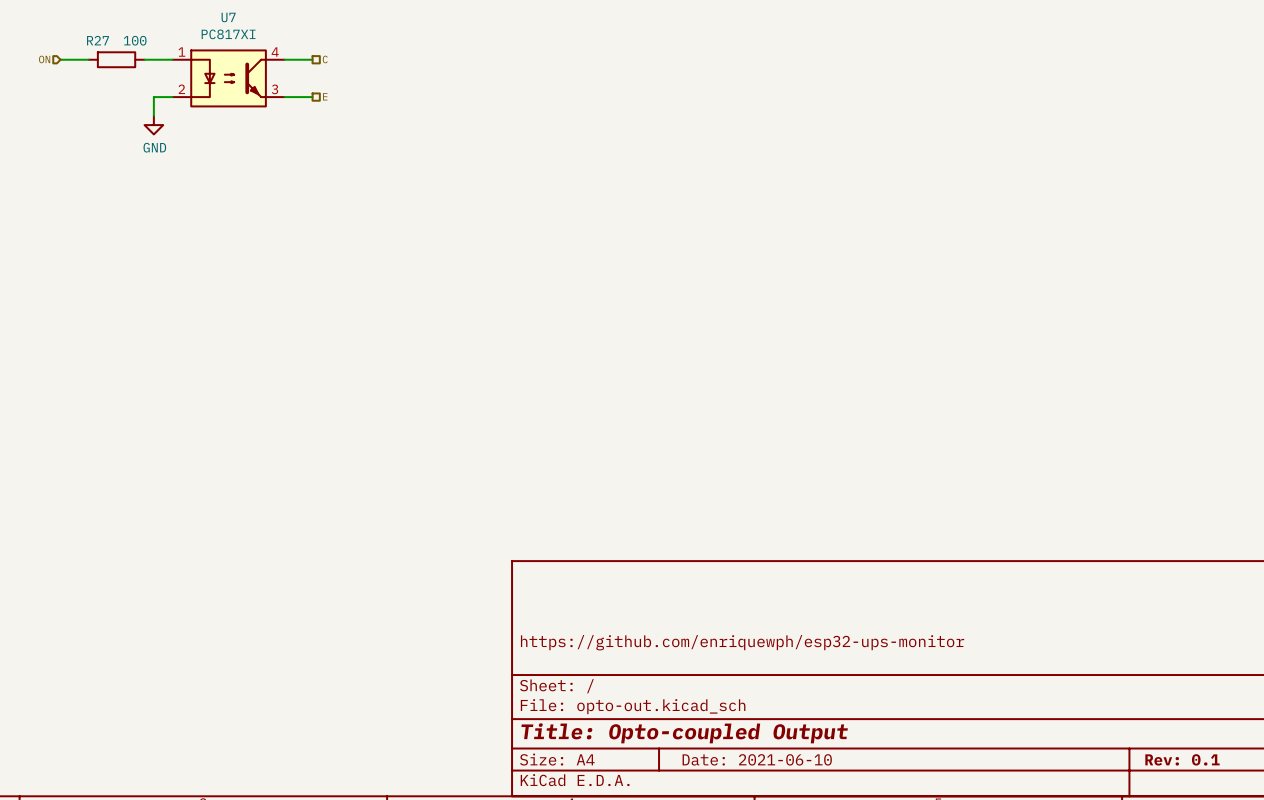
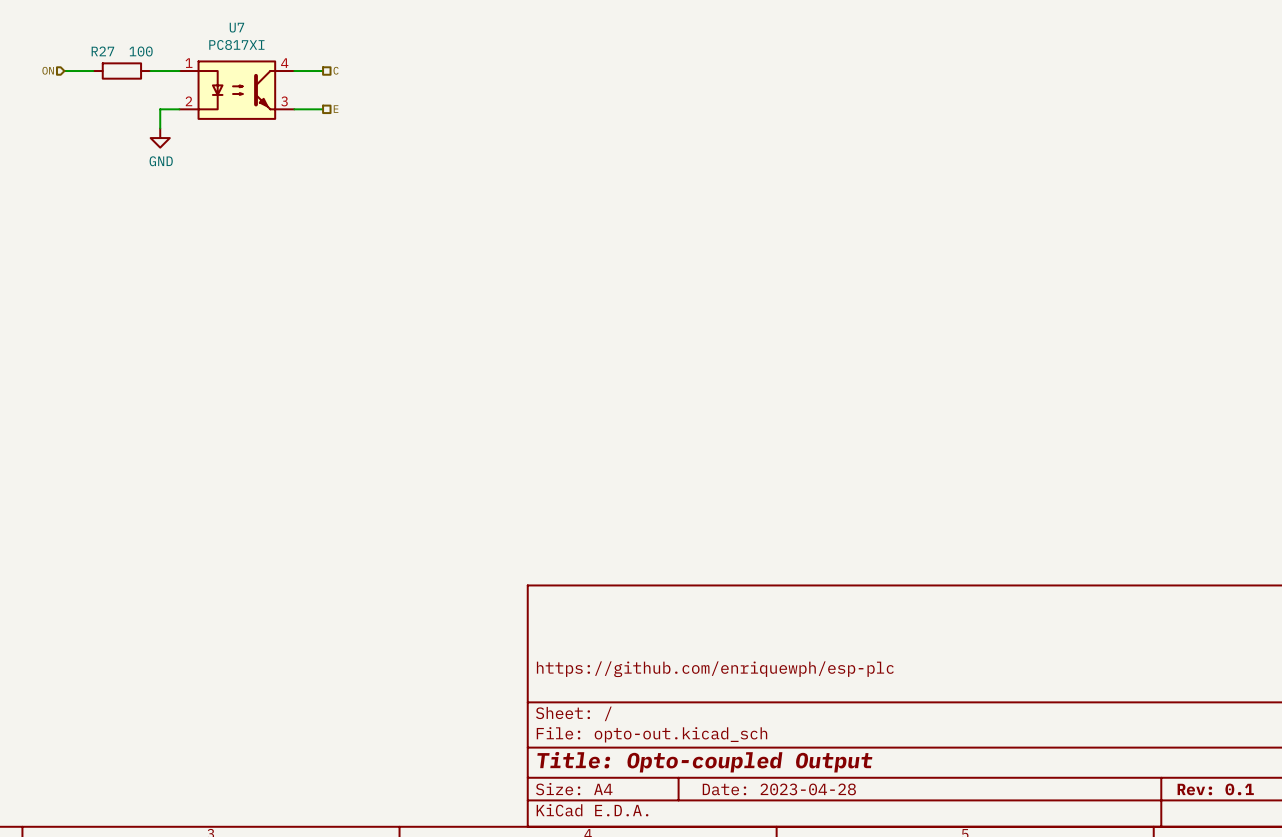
title block: https://github.com/enriquewph/esp32-ups-monitor (742, 642) -> https://github.com/enriquewph/esp-plc (715, 669)
title block: Date: 2021-06-10 (757, 759) -> Date: 2023-04-28 (779, 789)

